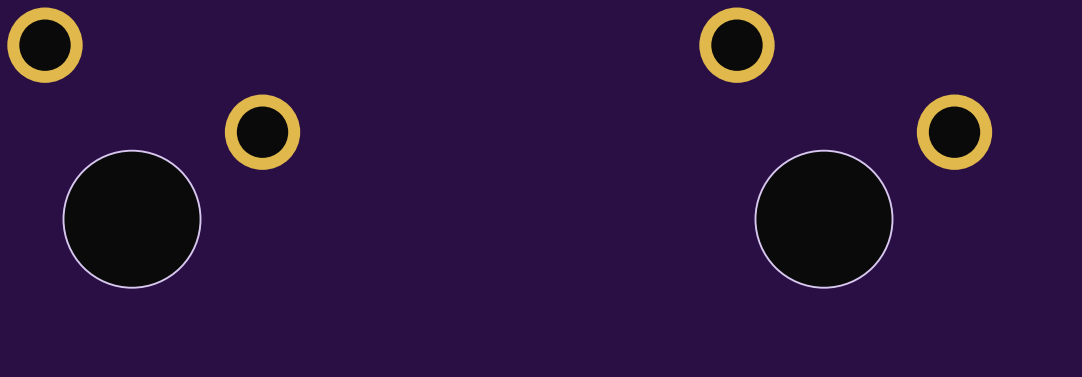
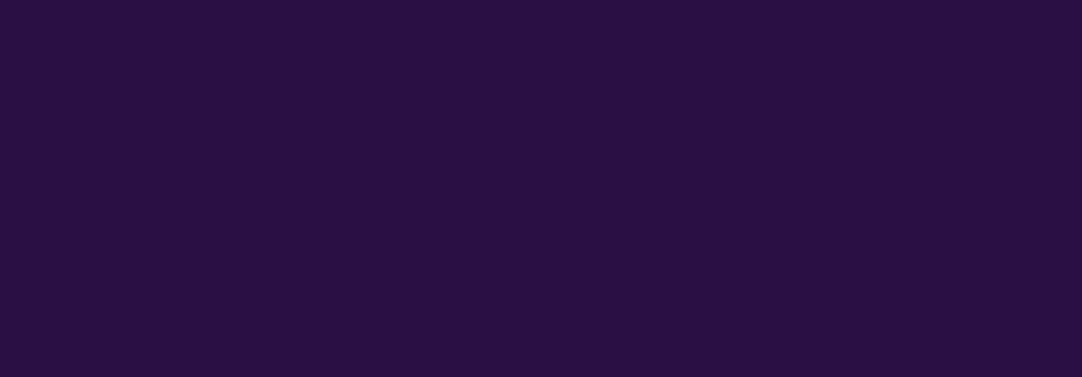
part: (153, 147) -> none
part: (845, 147) -> none

